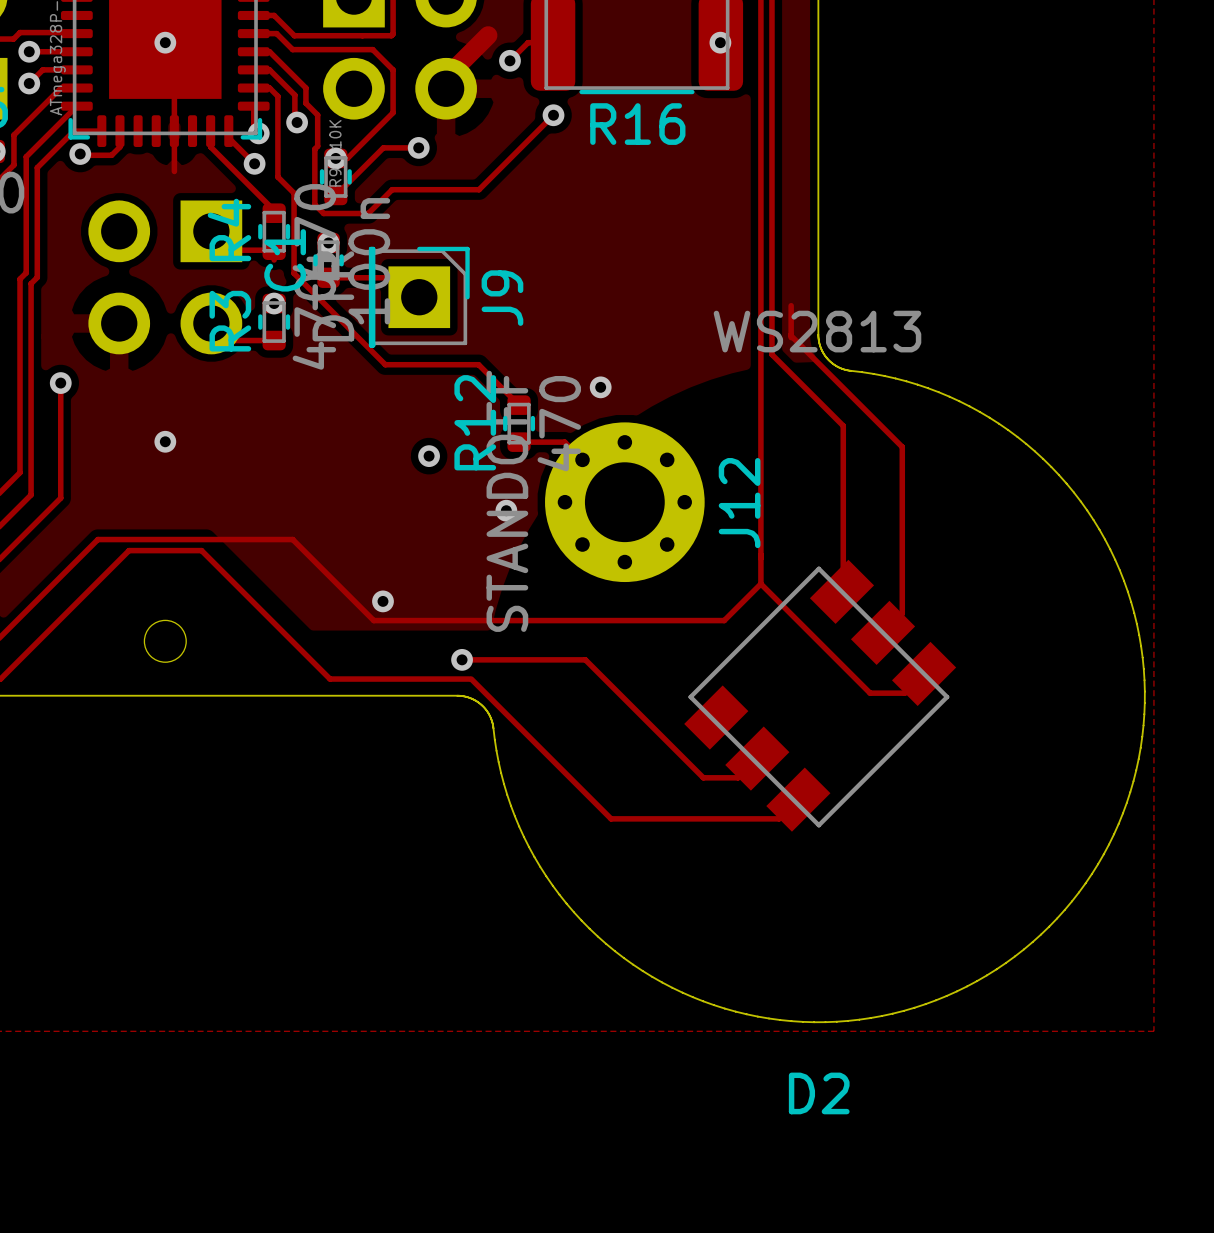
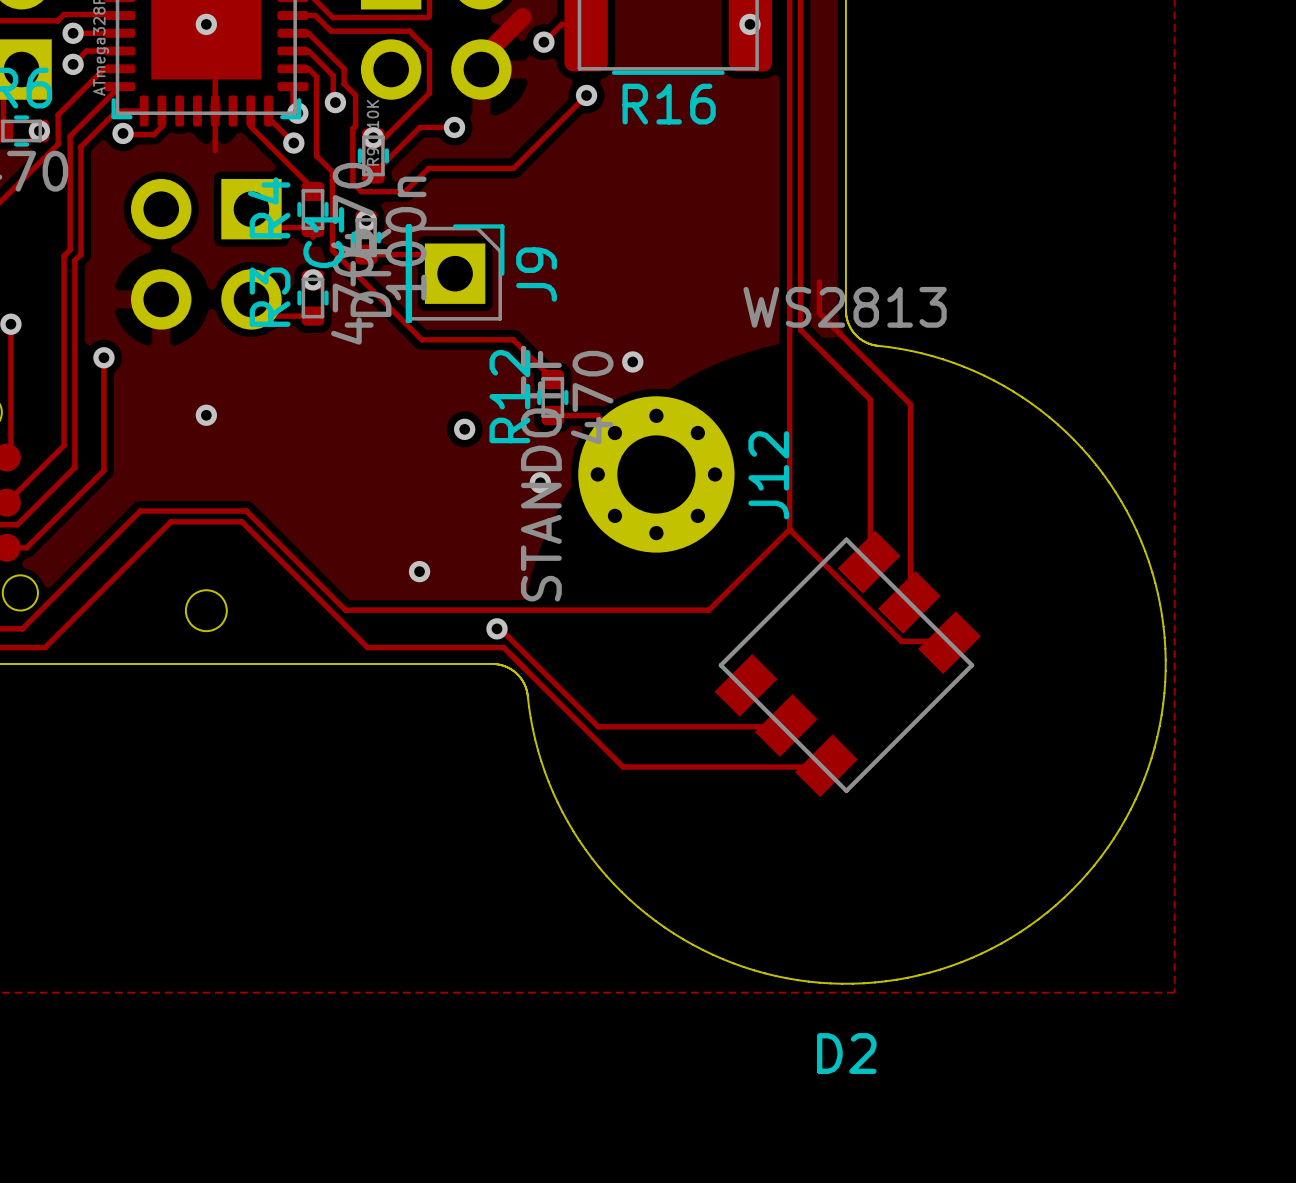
track: (791, 335) (902, 446) (902, 613) (883, 632) -> none
track: none -> (819, 313) (910, 404) (910, 601)
track: (206, 539) (292, 539) (373, 620) (724, 620) (760, 583) -> (246, 511) (345, 610) (709, 610) (789, 529) (901, 641) (950, 641)
track: (760, 558) (760, 583) -> none
track: (760, 583) (870, 693) (904, 693) (924, 673) -> none
track: (465, 659) (585, 659) (703, 777) (738, 777) (757, 758) -> (500, 628) (598, 726) (784, 726)
track: none -> (503, 647) (623, 767) (825, 767)
track: (471, 679) (611, 818) (779, 818) (798, 799) -> none

